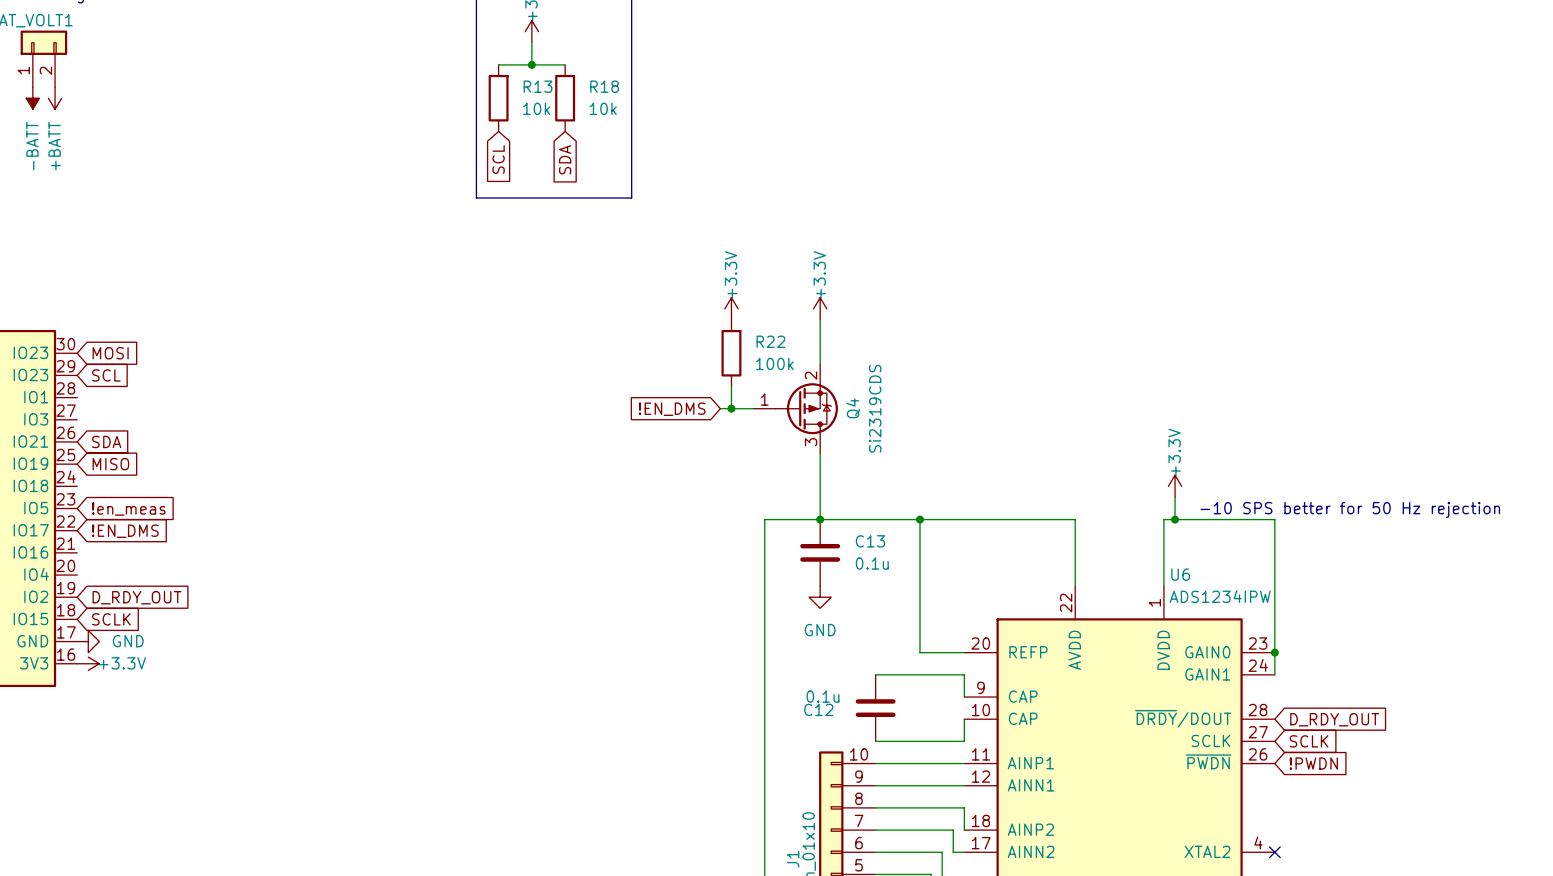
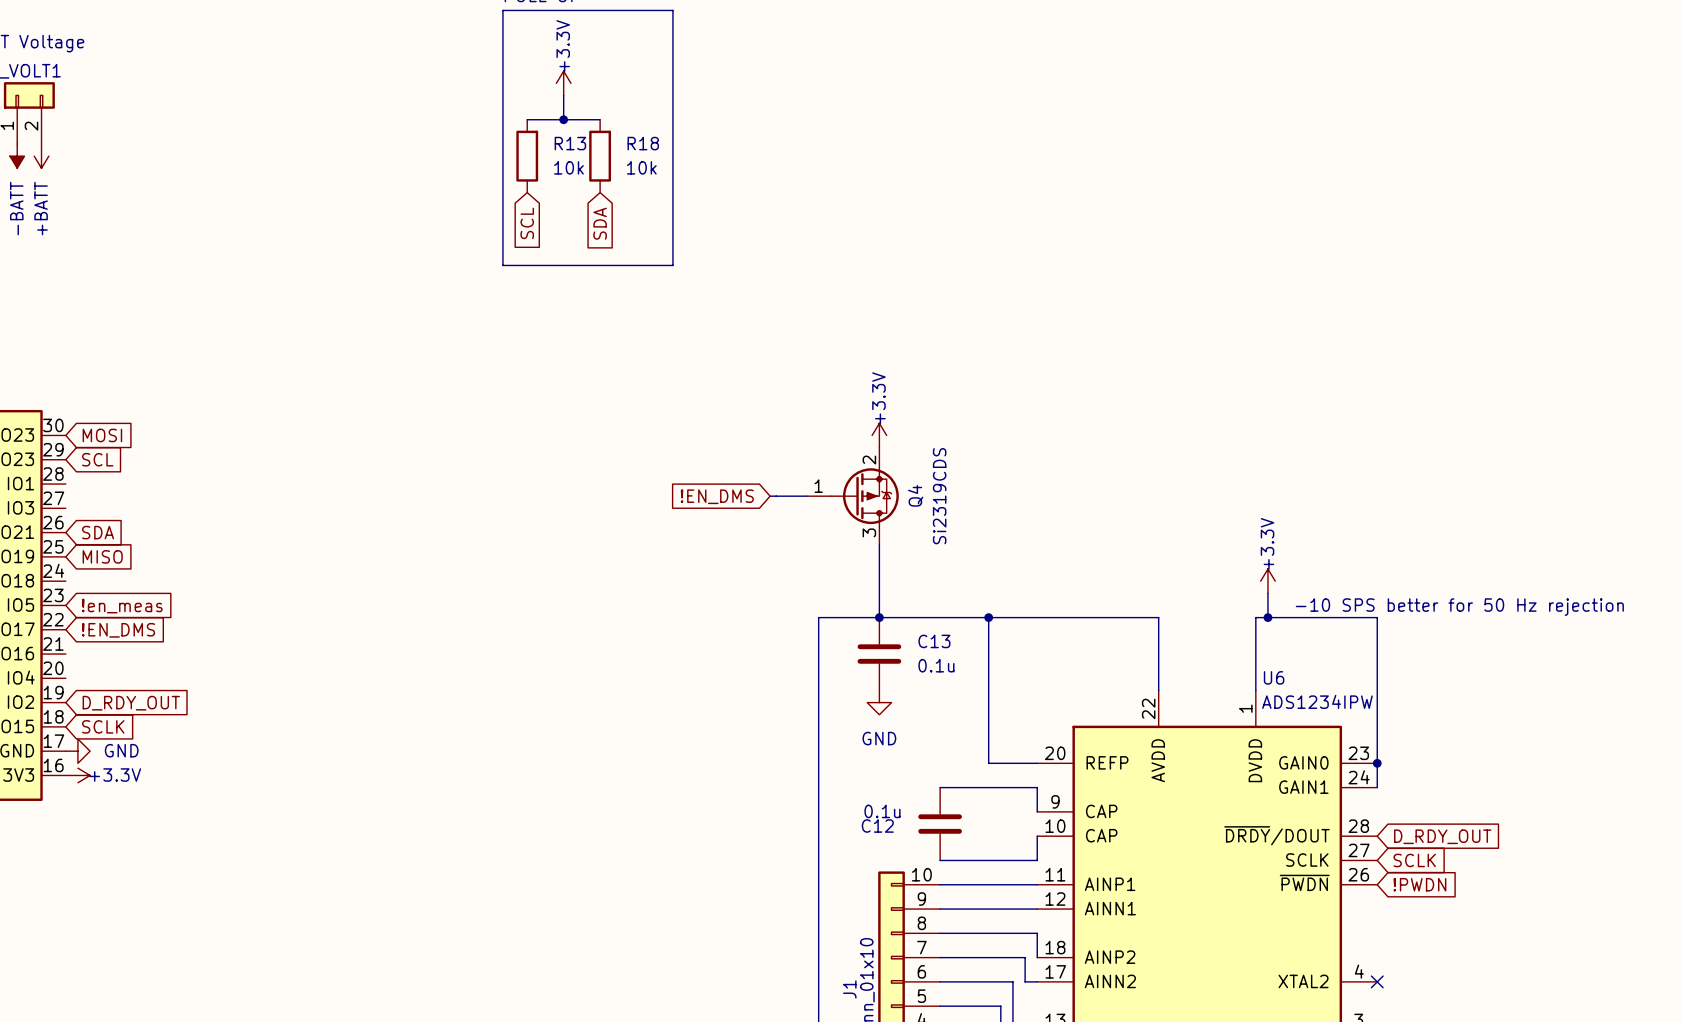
power symbol: +3.3V (731, 308) -> none
power symbol position: +3.3V (820, 308) -> +3.3V (879, 435)
R22: 100k (731, 353) -> none
wire: (731, 386) (731, 408) -> none
junction: (731, 408) -> none

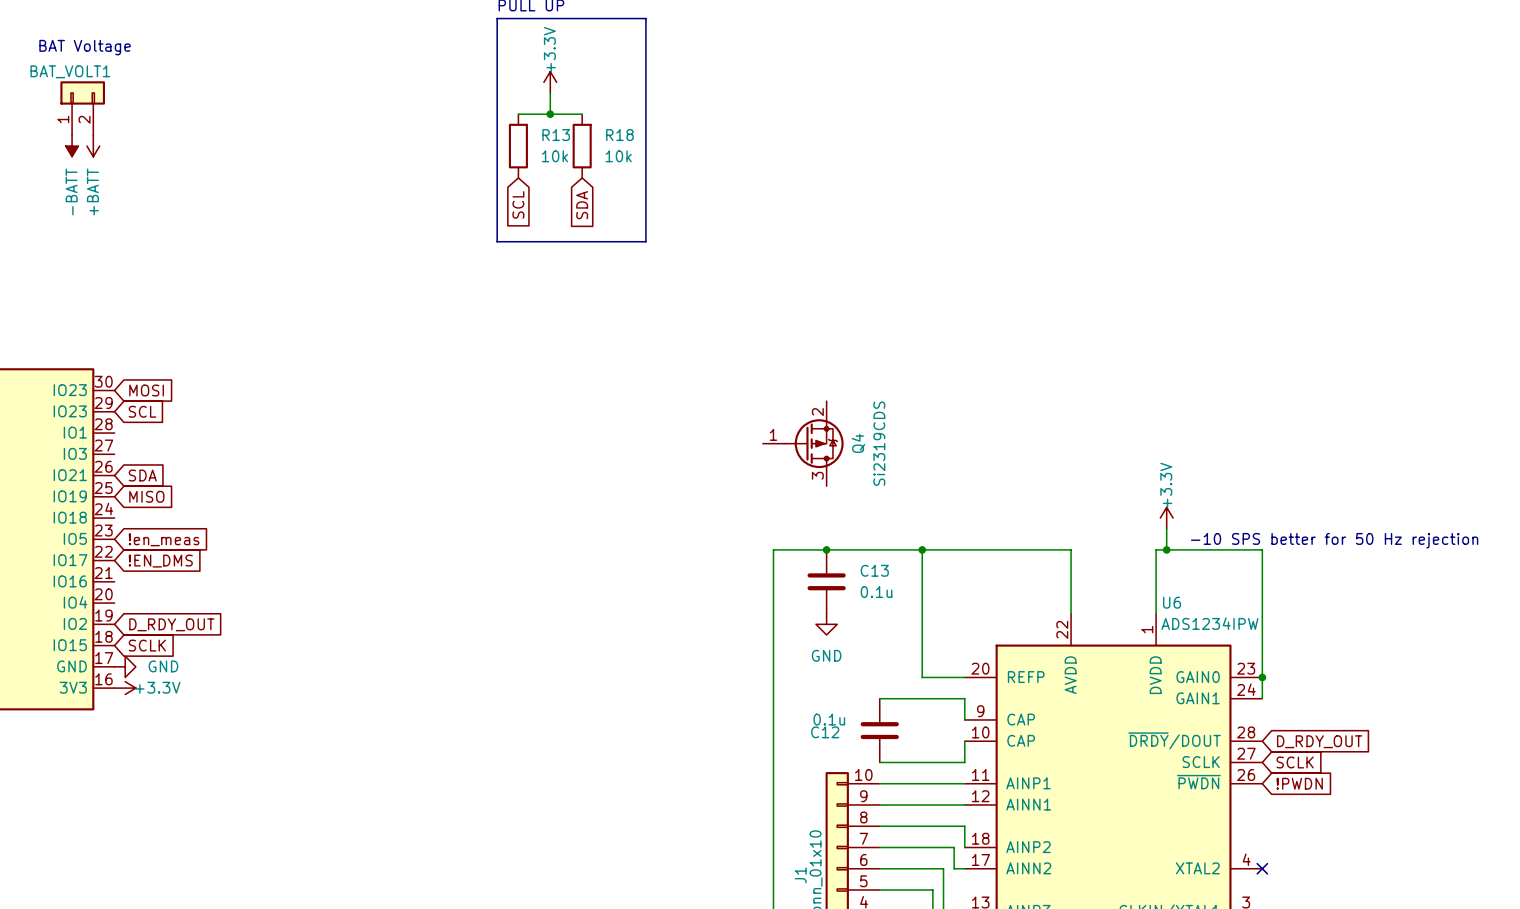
power symbol: +3.3V (879, 435) -> none
global label: !EN_DMS (717, 496) -> none
wire: (770, 496) (806, 496) -> none
wire: (879, 544) (879, 617) -> none

